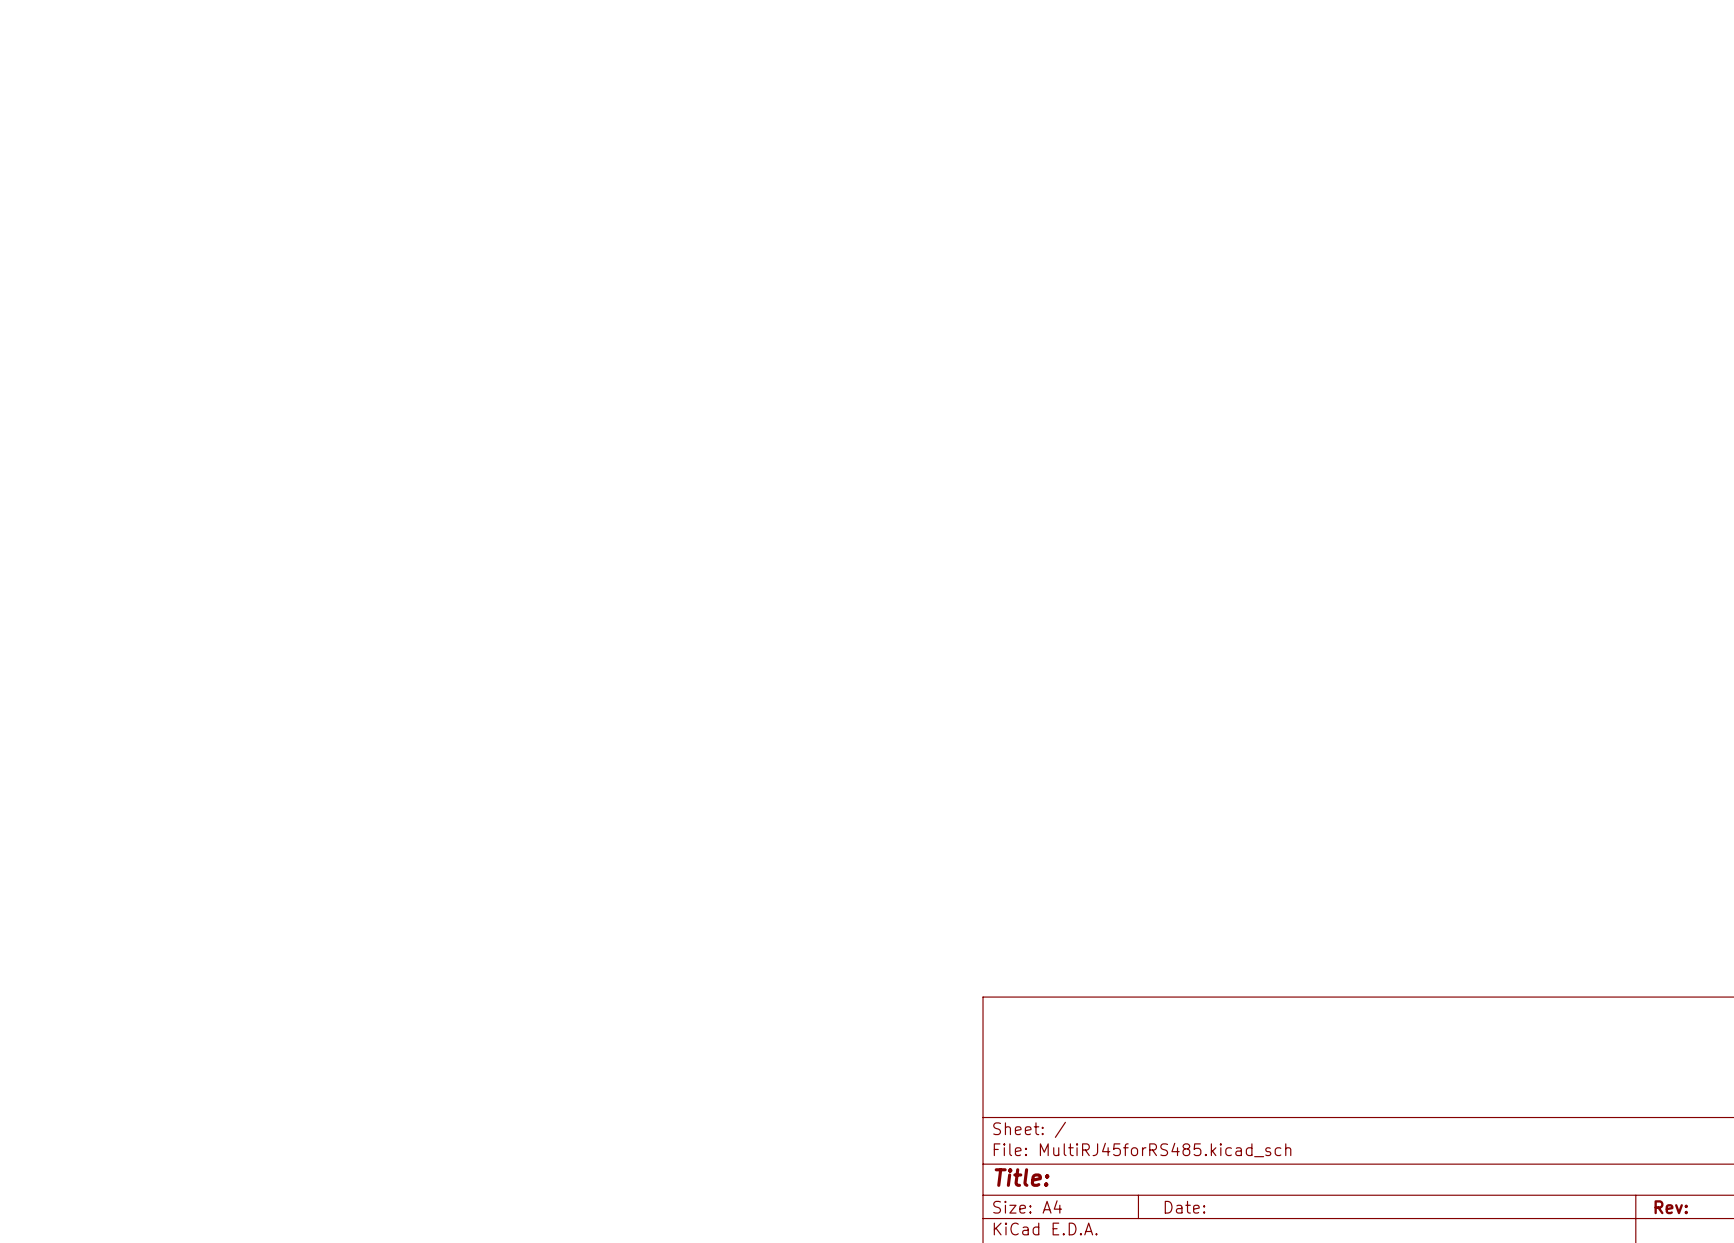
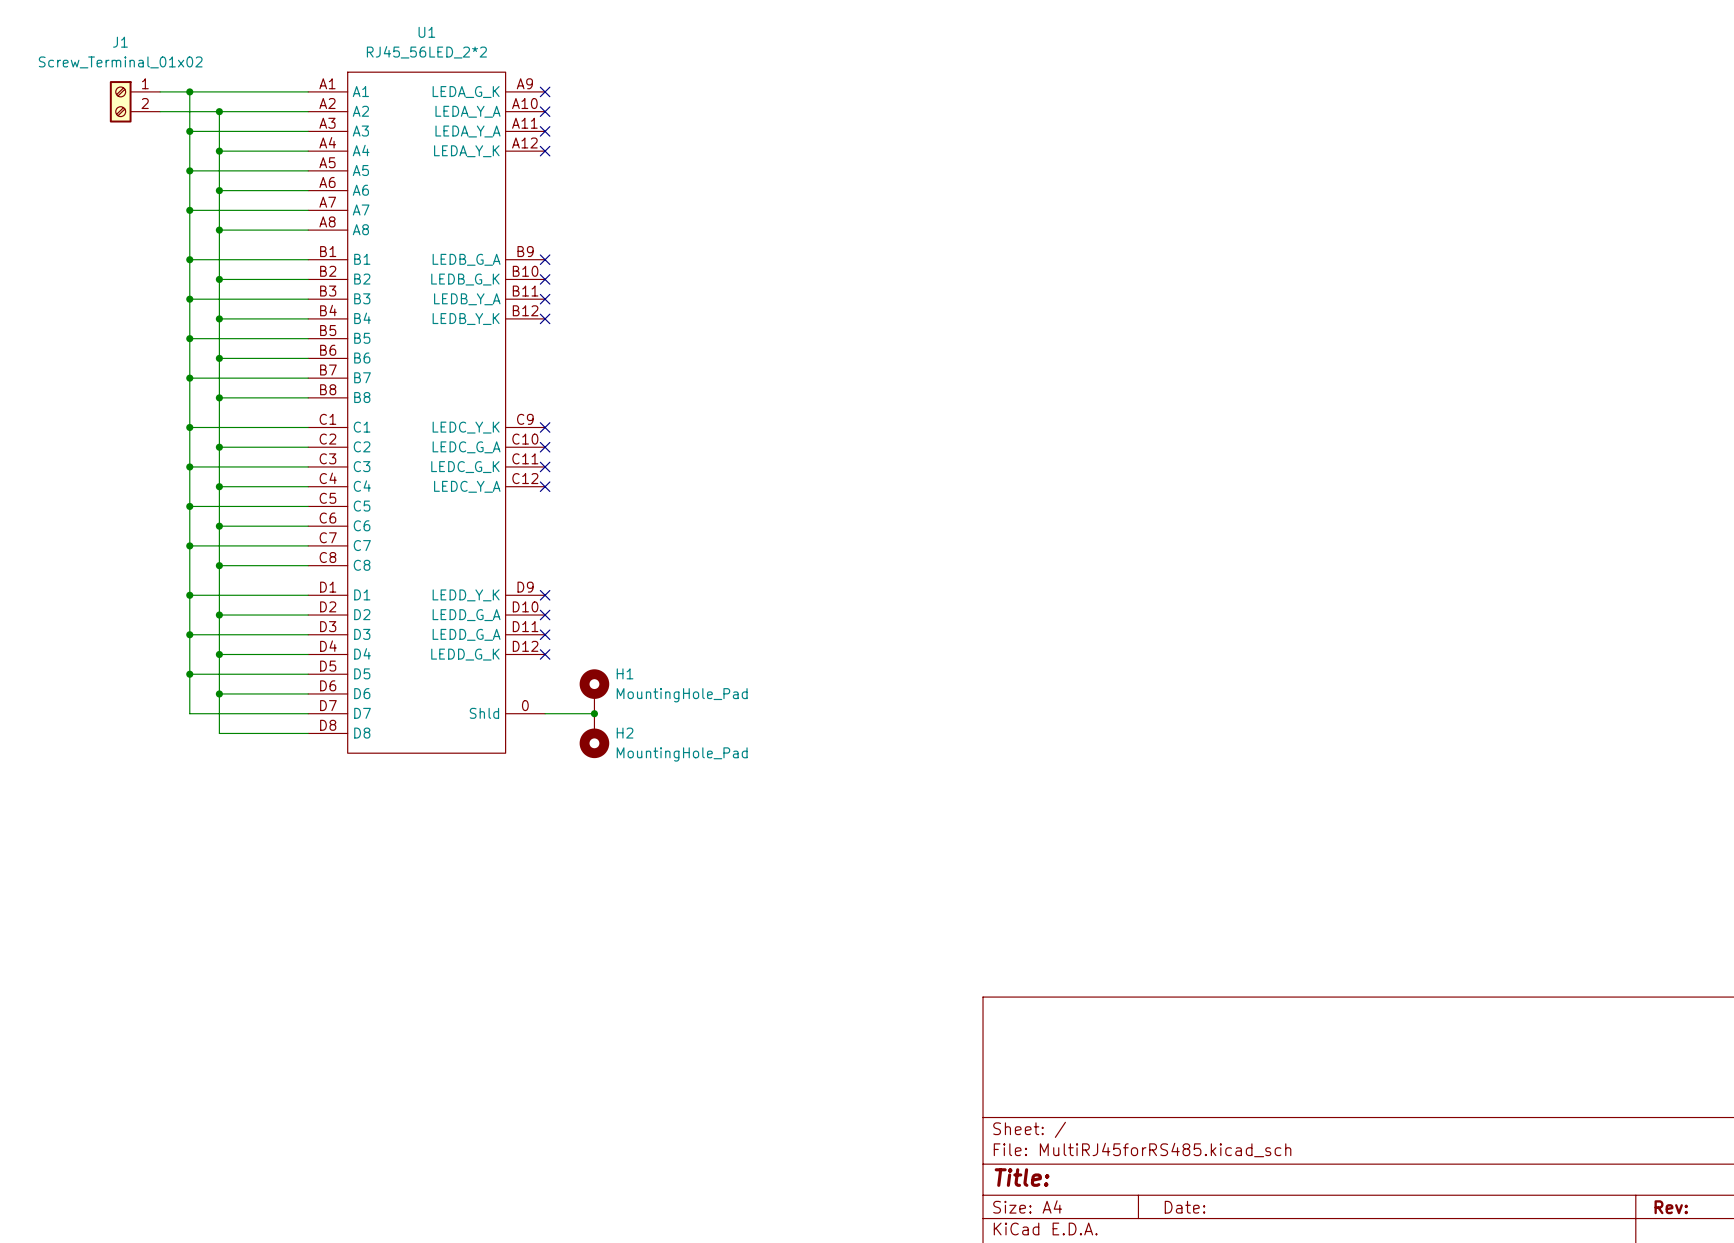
wire: none -> (160, 91) (308, 91)
wire: none -> (189, 91) (189, 713) (308, 713)
junction: none -> (189, 91)
no-connect mark: none -> (545, 91)
J1: none -> Screw_Terminal_01x02 (135, 101)
wire: none -> (160, 111) (308, 111)
wire: none -> (219, 111) (219, 733) (308, 733)
junction: none -> (219, 111)
no-connect mark: none -> (545, 111)
wire: none -> (189, 131) (308, 131)
junction: none -> (189, 131)
no-connect mark: none -> (545, 131)
wire: none -> (219, 151) (308, 151)
junction: none -> (219, 151)
no-connect mark: none -> (545, 151)
wire: none -> (189, 170) (308, 170)
junction: none -> (189, 170)
wire: none -> (219, 190) (308, 190)
junction: none -> (219, 190)
wire: none -> (189, 210) (308, 210)
junction: none -> (189, 210)
wire: none -> (219, 230) (308, 230)
junction: none -> (219, 230)
wire: none -> (189, 259) (308, 259)
junction: none -> (189, 259)
no-connect mark: none -> (545, 259)
wire: none -> (219, 279) (308, 279)
junction: none -> (219, 279)
no-connect mark: none -> (545, 279)
wire: none -> (189, 299) (308, 299)
junction: none -> (189, 299)
no-connect mark: none -> (545, 299)
wire: none -> (219, 318) (308, 318)
junction: none -> (219, 318)
no-connect mark: none -> (545, 318)
wire: none -> (189, 338) (308, 338)
junction: none -> (189, 338)
wire: none -> (219, 358) (308, 358)
junction: none -> (219, 358)
wire: none -> (189, 378) (308, 378)
junction: none -> (189, 378)
wire: none -> (219, 397) (308, 397)
junction: none -> (219, 397)
U1: none -> RJ45_56LED_2*2 (426, 412)
wire: none -> (189, 427) (308, 427)
junction: none -> (189, 427)
no-connect mark: none -> (545, 427)
wire: none -> (219, 447) (308, 447)
junction: none -> (219, 447)
no-connect mark: none -> (545, 447)
wire: none -> (189, 466) (308, 466)
junction: none -> (189, 466)
no-connect mark: none -> (545, 466)
wire: none -> (219, 486) (308, 486)
junction: none -> (219, 486)
no-connect mark: none -> (545, 486)
wire: none -> (189, 506) (308, 506)
junction: none -> (189, 506)
wire: none -> (219, 526) (308, 526)
junction: none -> (219, 526)
wire: none -> (189, 545) (308, 545)
junction: none -> (189, 545)
wire: none -> (219, 565) (308, 565)
junction: none -> (219, 565)
wire: none -> (189, 595) (308, 595)
junction: none -> (189, 595)
no-connect mark: none -> (545, 595)
wire: none -> (219, 615) (308, 615)
junction: none -> (219, 615)
no-connect mark: none -> (545, 615)
wire: none -> (189, 634) (308, 634)
junction: none -> (189, 634)
no-connect mark: none -> (545, 634)
wire: none -> (219, 654) (308, 654)
junction: none -> (219, 654)
no-connect mark: none -> (545, 654)
wire: none -> (189, 674) (308, 674)
junction: none -> (189, 674)
H1: none -> MountingHole_Pad (594, 691)
wire: none -> (219, 693) (308, 693)
junction: none -> (219, 693)
wire: none -> (545, 713) (594, 713)
junction: none -> (594, 713)
H2: none -> MountingHole_Pad (594, 735)

